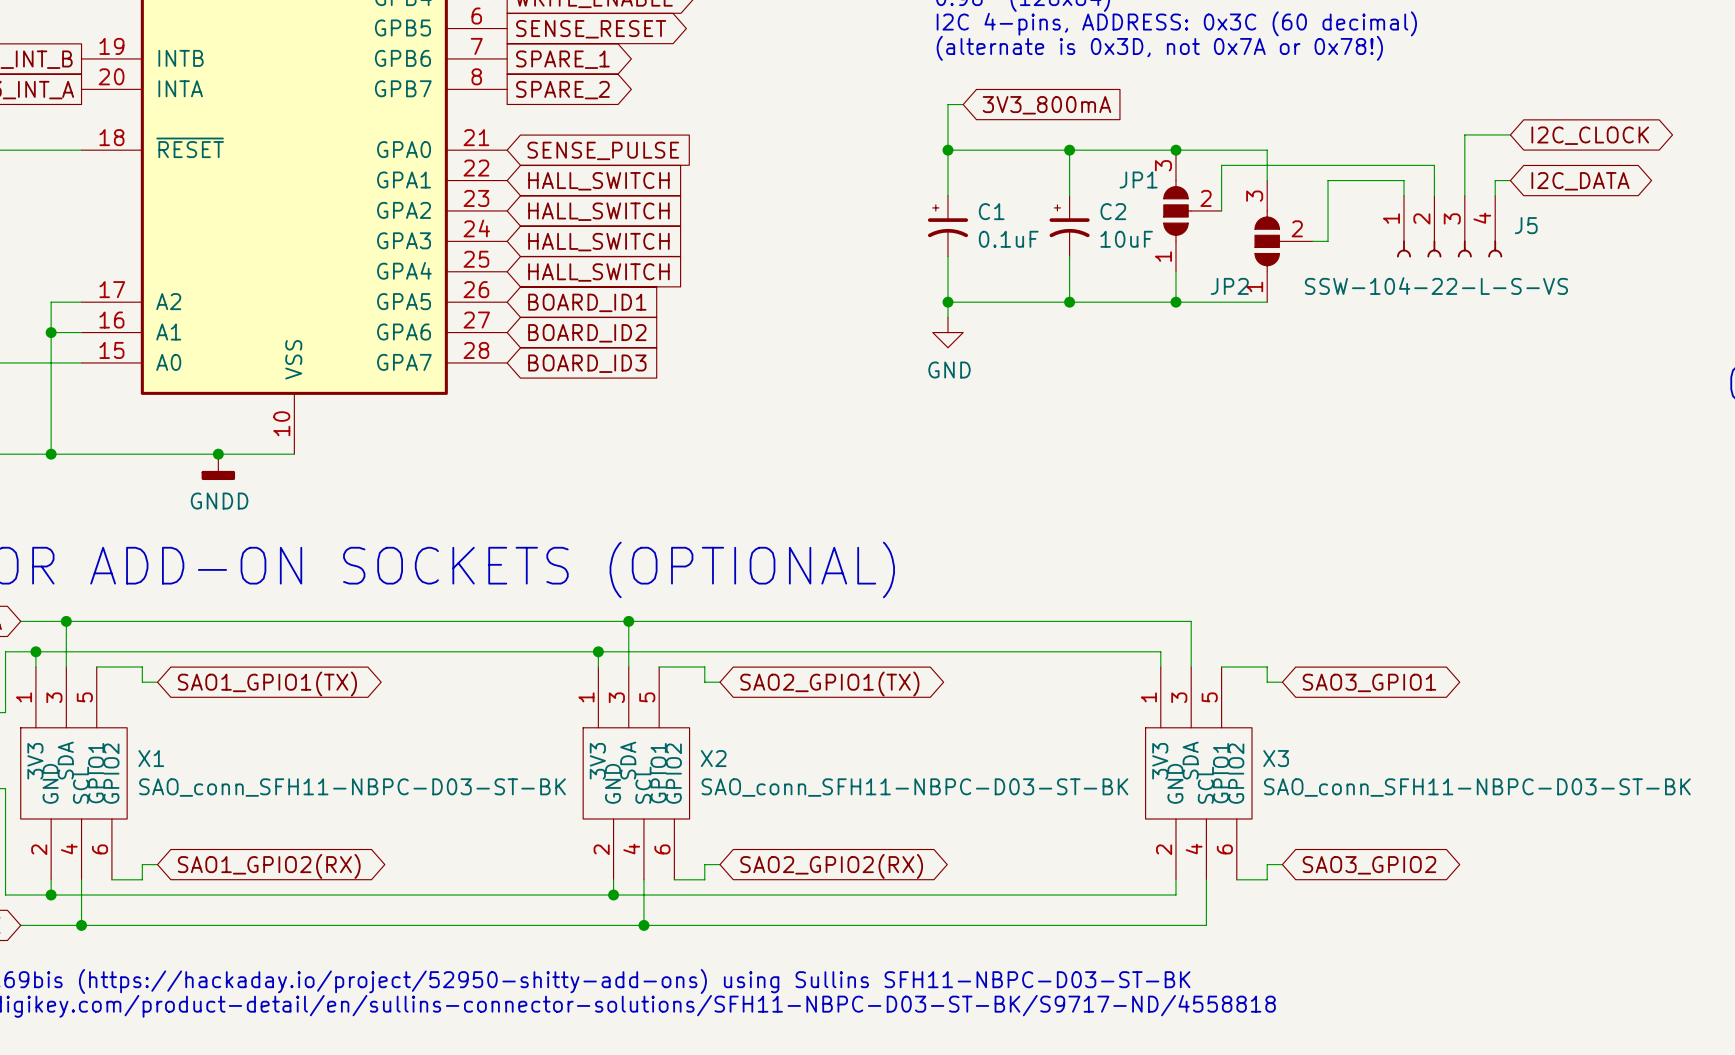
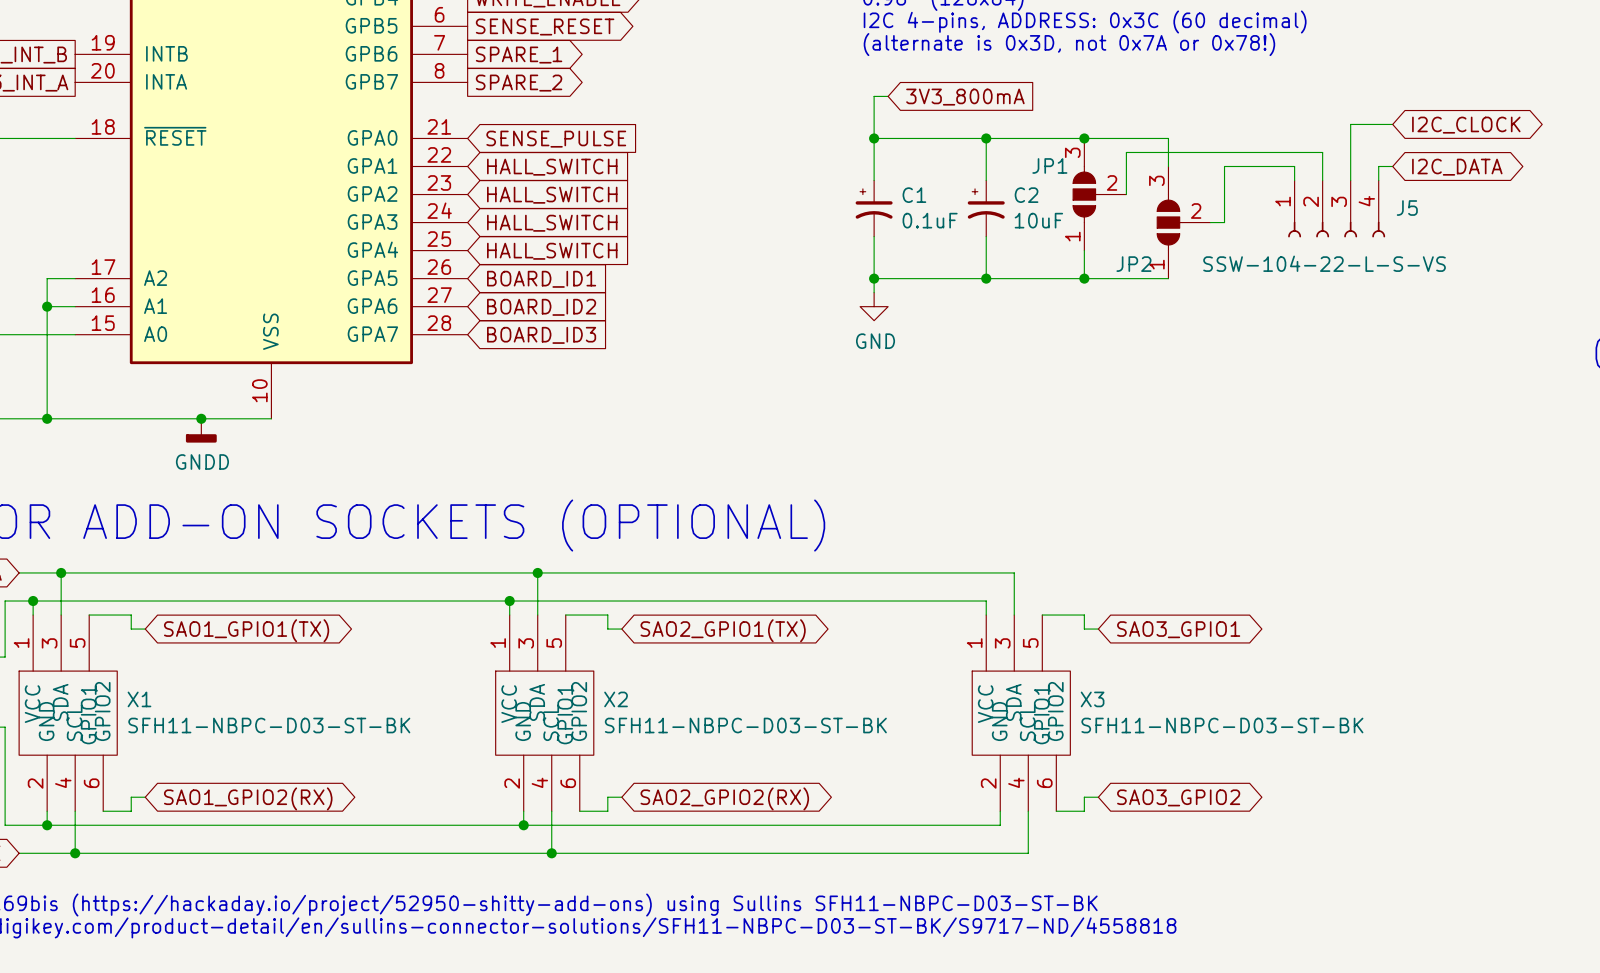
junction: none -> (537, 572)
wire: (628, 621) (628, 666) -> (537, 572) (537, 615)
junction: (628, 621) -> none
wire: (1099, 621) (1191, 621) (1191, 666) -> (1014, 572) (1014, 615)
junction: none -> (509, 601)
wire: (598, 651) (598, 666) -> (509, 601) (509, 615)
junction: (598, 651) -> none
wire: (1069, 651) (1160, 651) (1160, 666) -> (986, 601) (986, 615)
X1 symbol: [20, 666, 128, 880] -> [19, 615, 118, 812]
X2 symbol: [583, 666, 690, 880] -> [495, 615, 594, 812]
wire: (659, 666) (704, 666) (704, 682) (719, 682) -> (565, 615) (607, 615) (607, 629) (621, 629)
X3 symbol: [1145, 666, 1253, 880] -> [972, 615, 1071, 812]
wire: (1221, 666) (1267, 666) (1267, 682) (1282, 682) -> (1042, 615) (1084, 615) (1084, 629) (1098, 629)
global label position: SAO3_GPIO1 (1369, 682) -> SAO3_GPIO1 (1178, 629)
global label position: SAO2_GPIO1(TX) (829, 684) -> SAO2_GPIO1(TX) (723, 630)
X1 value: SAO_conn_SFH11-NBPC-D03-ST-BK (352, 787) -> SFH11-NBPC-D03-ST-BK (269, 725)
X2 value: SAO_conn_SFH11-NBPC-D03-ST-BK (914, 787) -> SFH11-NBPC-D03-ST-BK (745, 725)
X3 value: SAO_conn_SFH11-NBPC-D03-ST-BK (1477, 787) -> SFH11-NBPC-D03-ST-BK (1222, 725)
wire: (719, 864) (704, 864) (704, 879) (674, 879) -> (621, 797) (607, 797) (607, 811) (579, 811)
wire: (1282, 864) (1267, 864) (1267, 879) (1236, 879) -> (1098, 797) (1084, 797) (1084, 811) (1056, 811)
global label position: SAO3_GPIO2 (1369, 865) -> SAO3_GPIO2 (1178, 797)
global label position: SAO2_GPIO2(RX) (831, 866) -> SAO2_GPIO2(RX) (724, 798)
wire: (613, 879) (613, 895) -> (523, 811) (523, 825)
wire: (643, 879) (643, 925) -> (551, 811) (551, 853)
wire: (1175, 879) (1175, 895) (1084, 895) -> (1000, 811) (1000, 825)
wire: (1206, 879) (1206, 925) (1115, 925) -> (1028, 811) (1028, 853)
junction: none -> (523, 825)
junction: (613, 895) -> none
junction: none -> (551, 853)
junction: (643, 925) -> none

